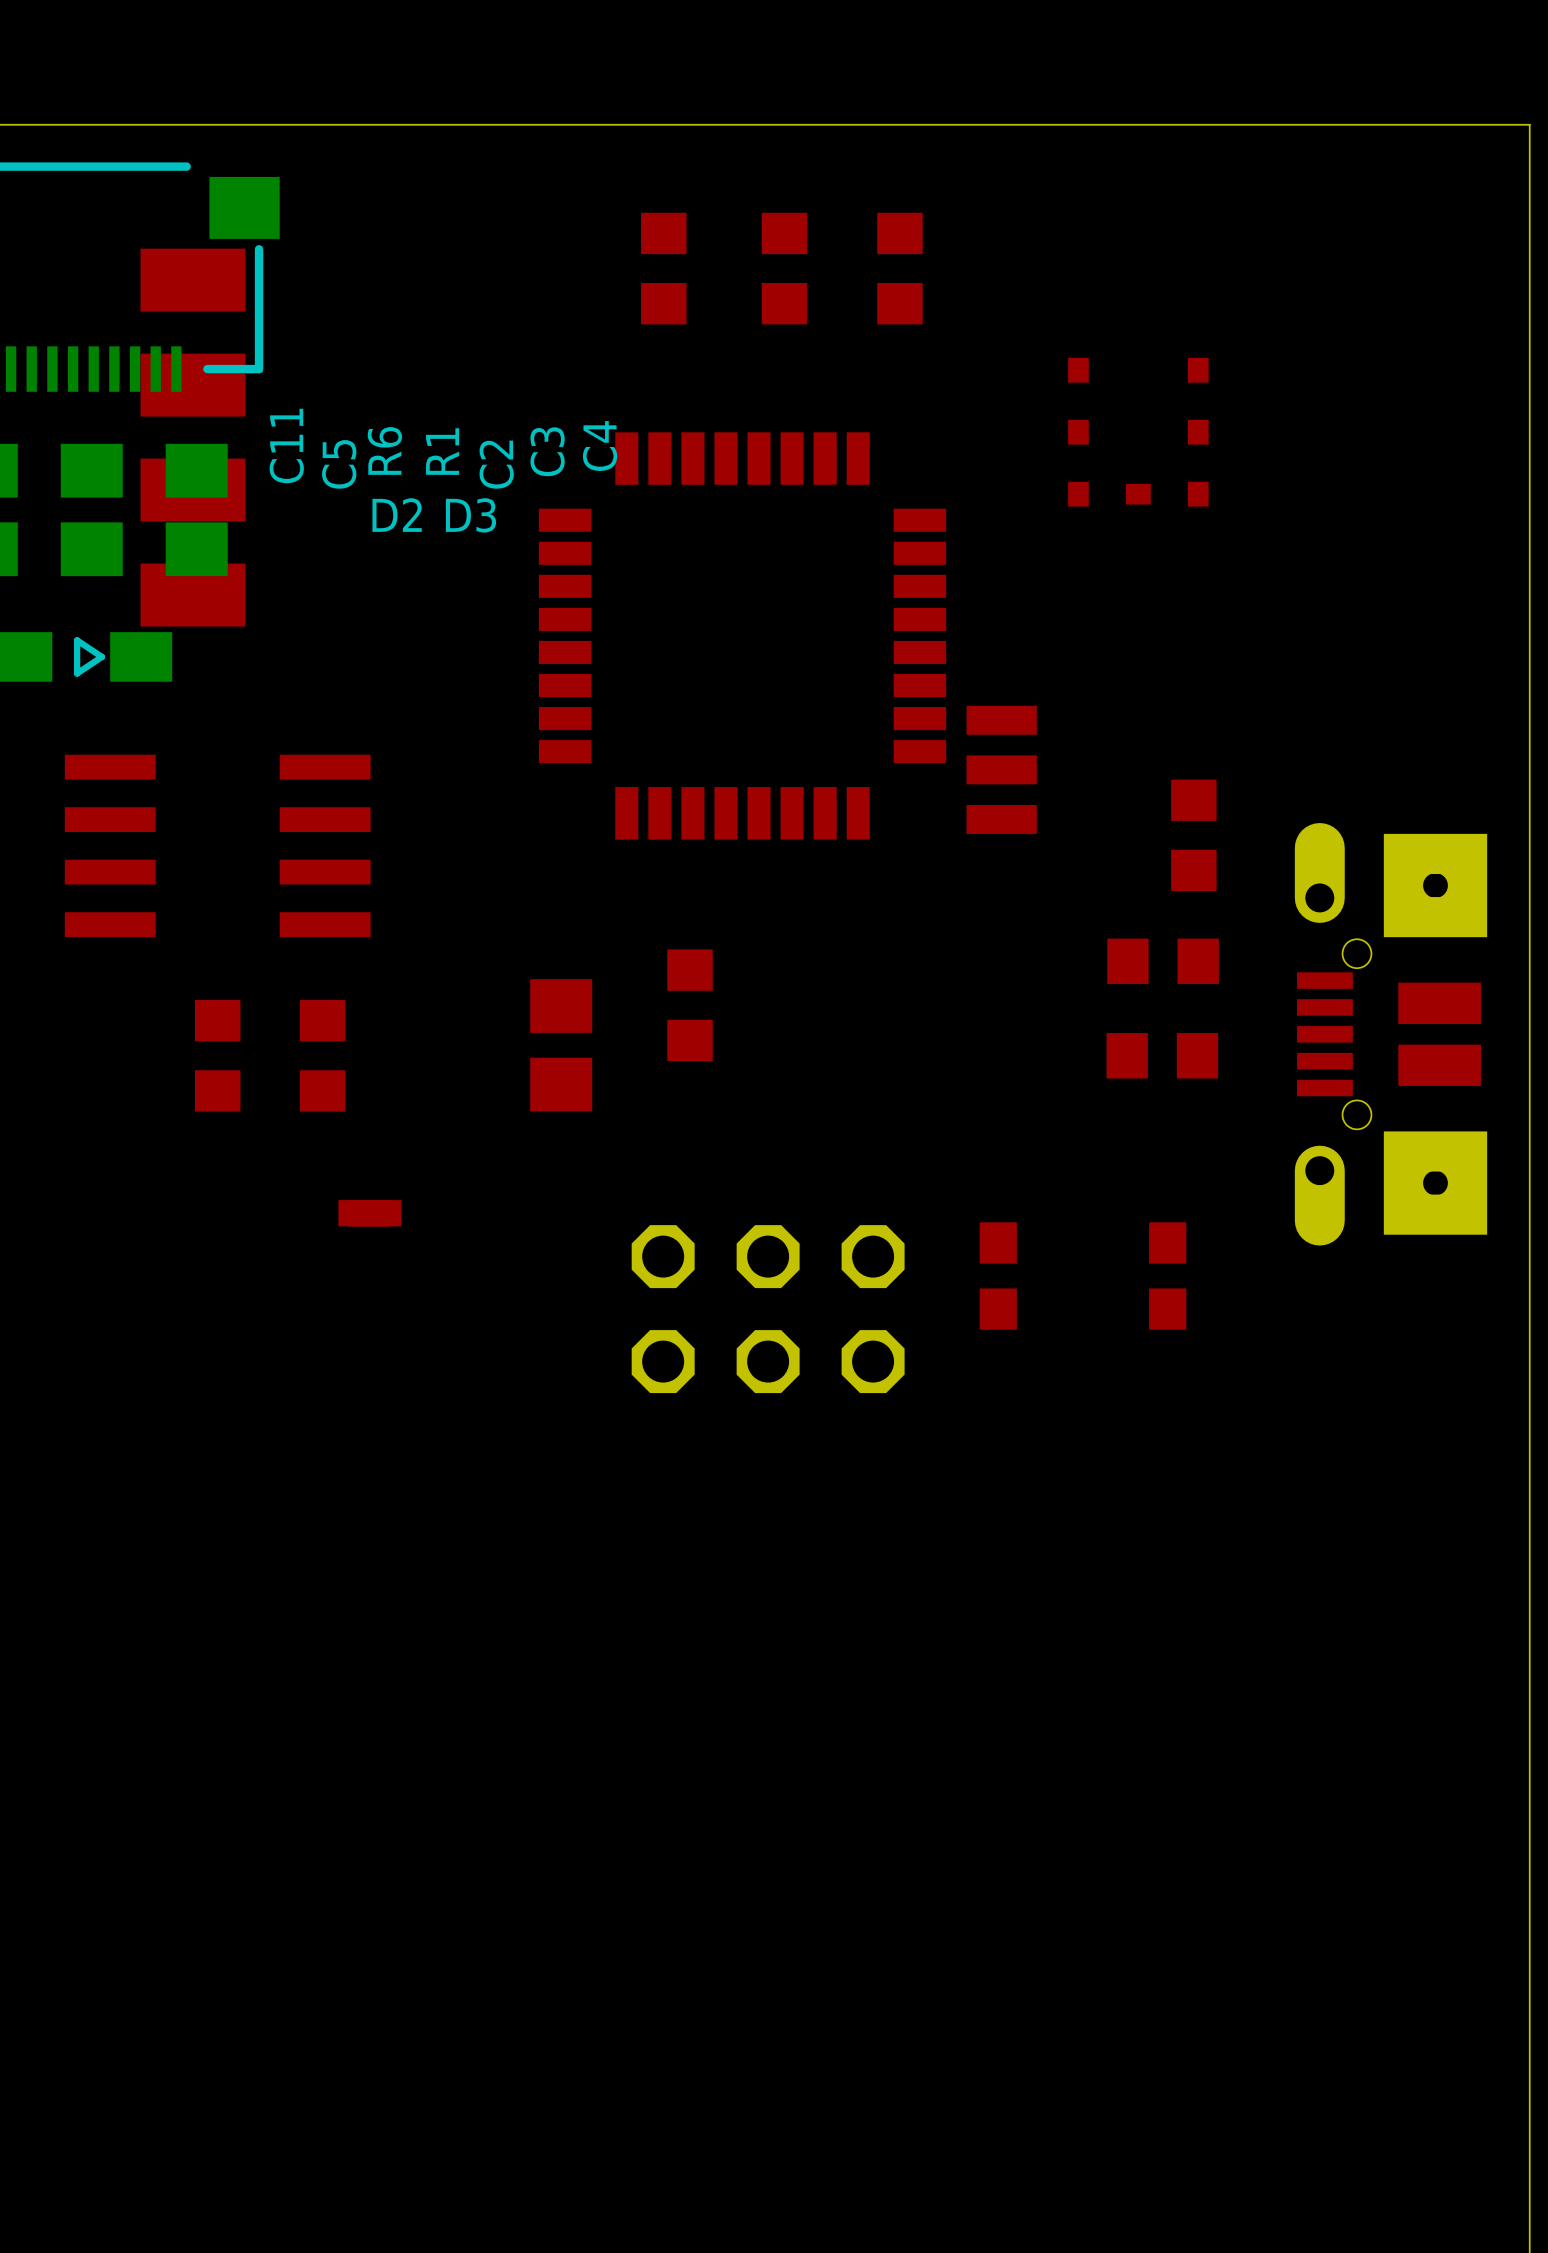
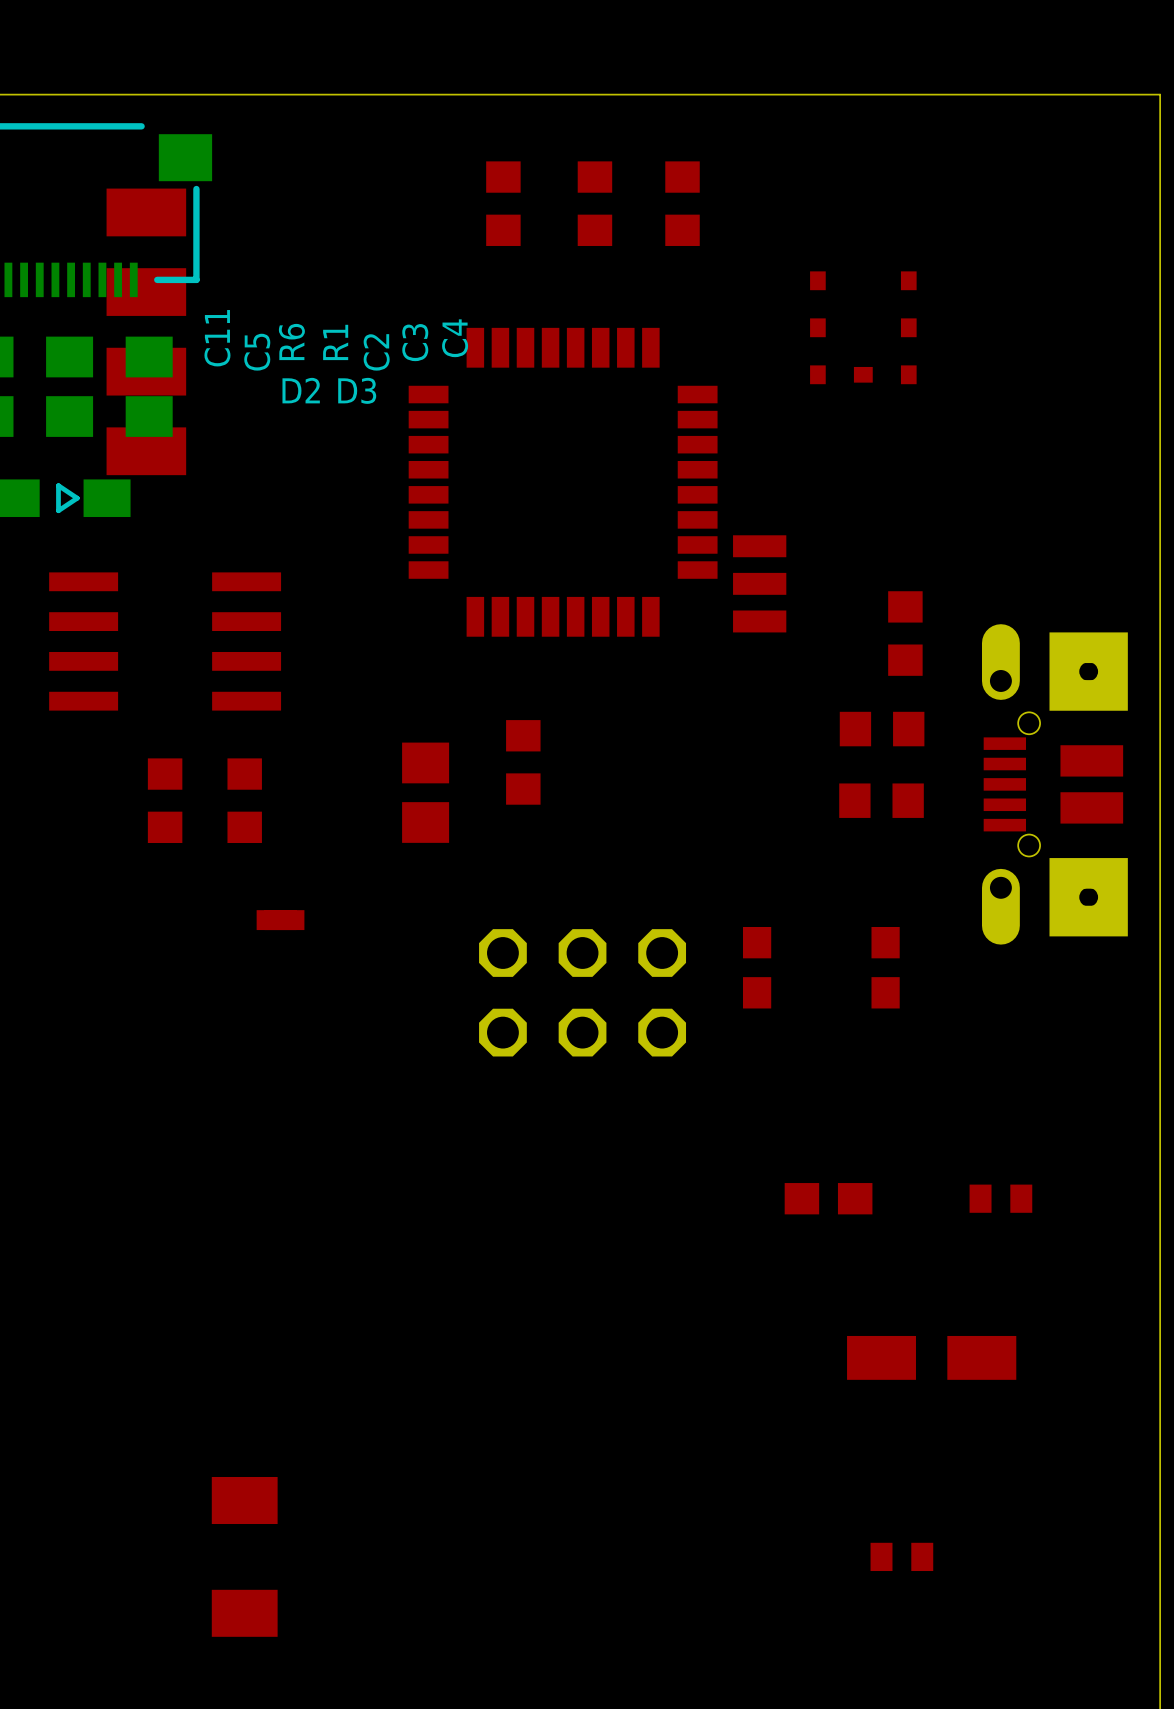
part: none -> (828, 1198)
part: none -> (1000, 1198)
part: none -> (931, 1357)
part: none -> (244, 1556)
part: none -> (901, 1556)

